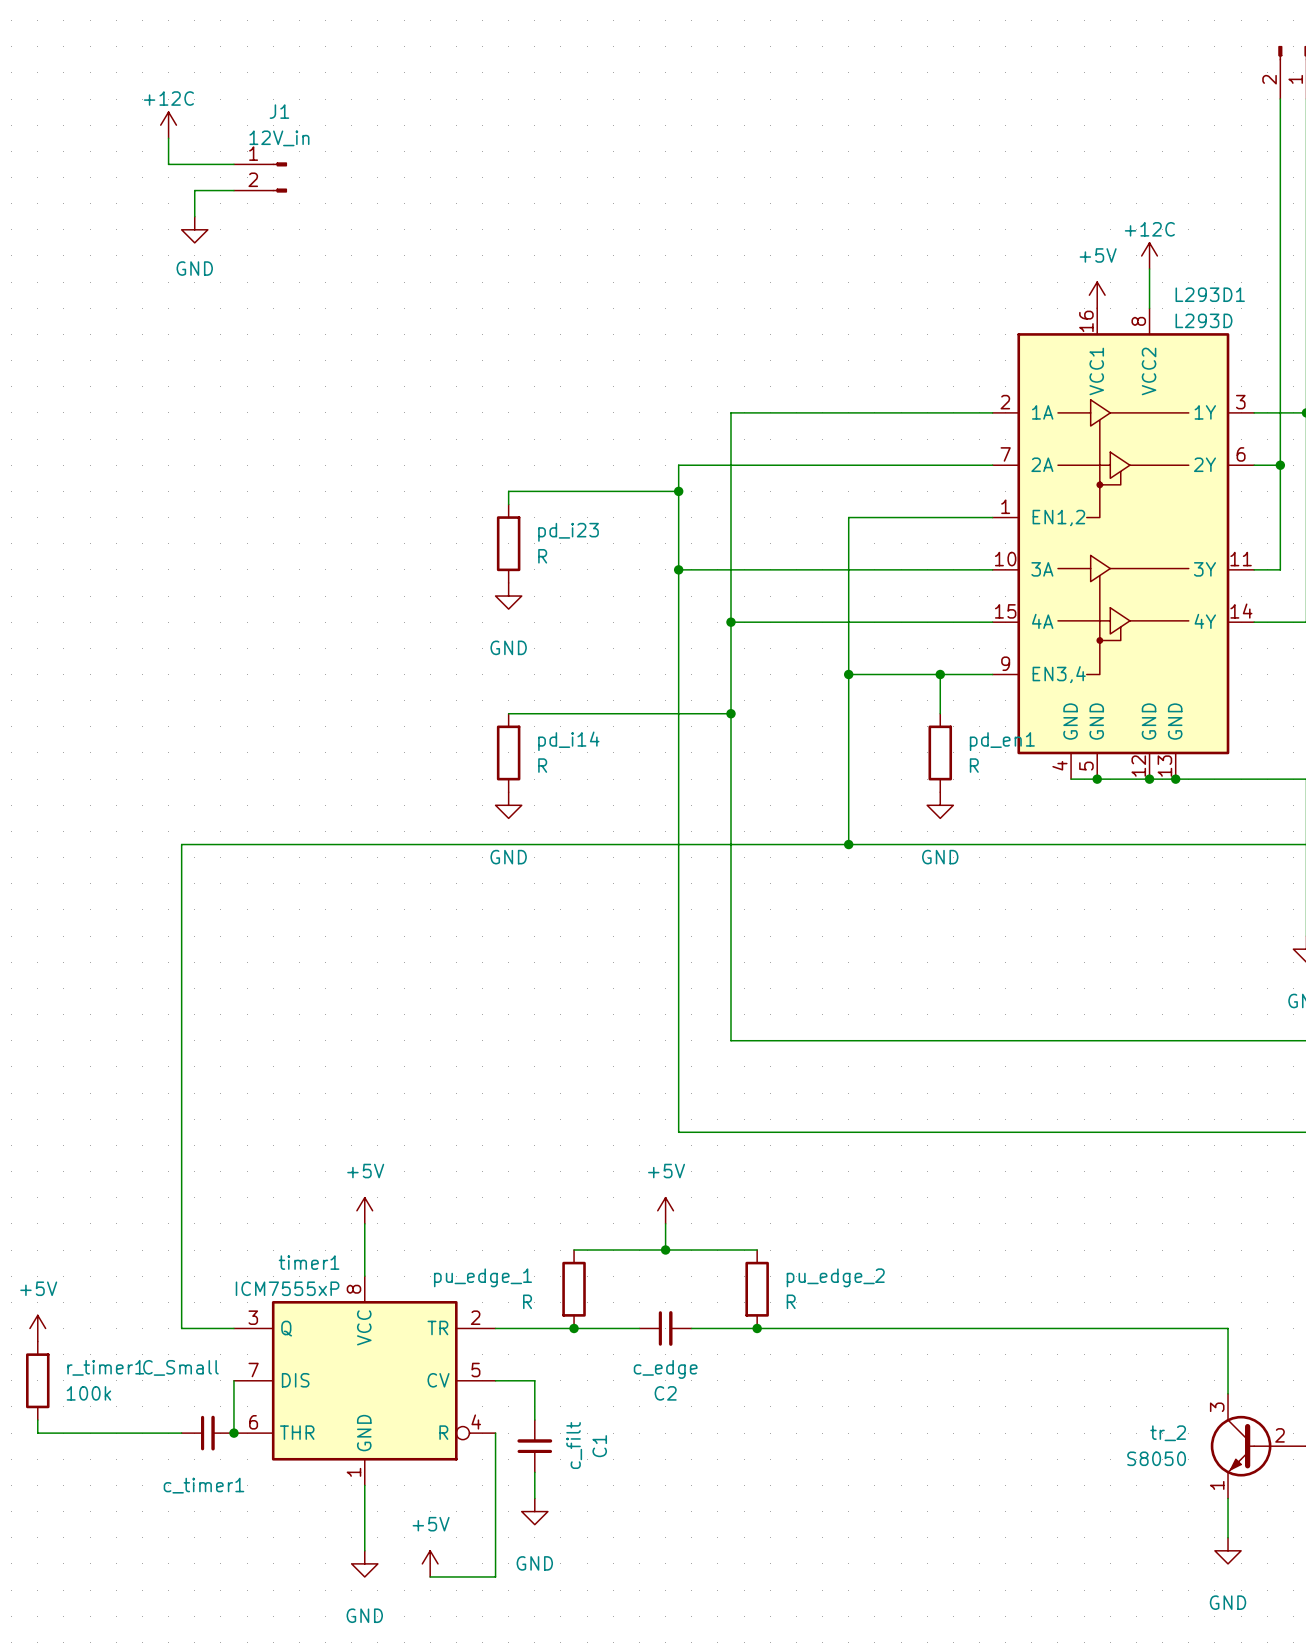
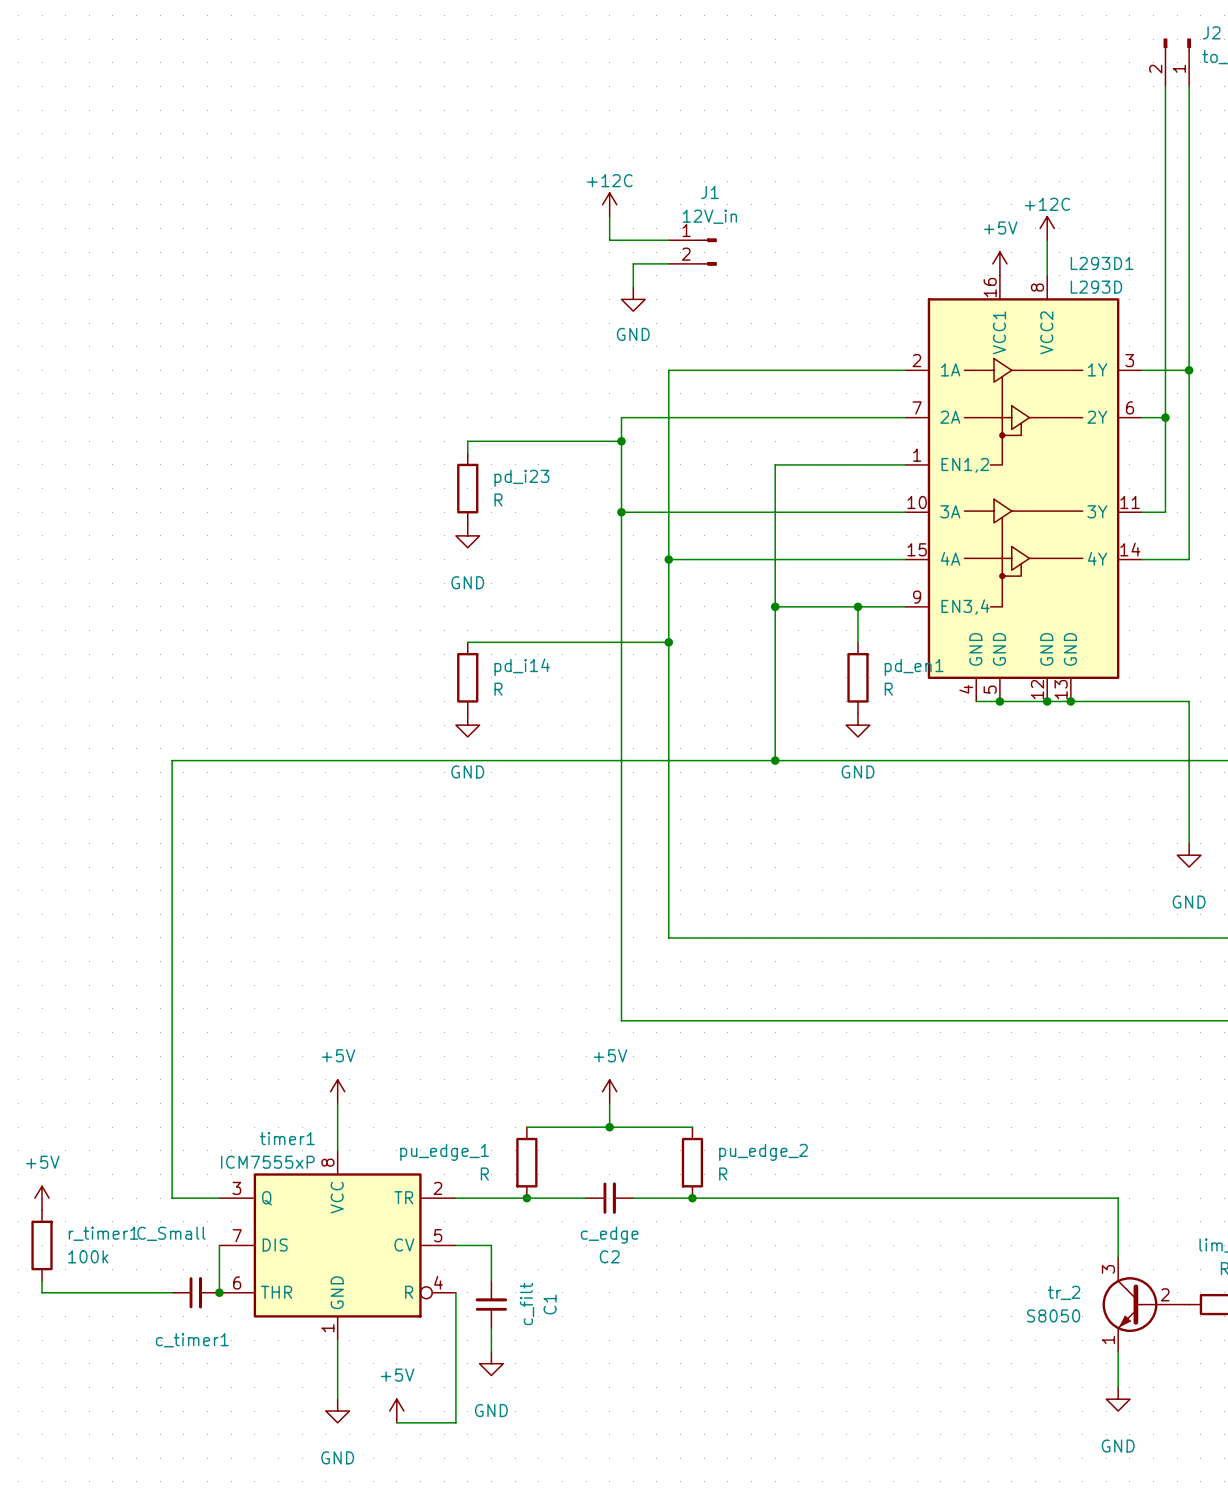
power symbol: +12C (168, 125) -> none
wire: (168, 138) (168, 164) (233, 164) -> none
J1 position: (260, 177) -> (692, 252)
wire: (233, 190) (194, 190) (194, 216) -> none
power symbol: GND (194, 229) -> none
power symbol: none -> +12C (609, 204)
wire: none -> (609, 216) (609, 240) (668, 240)
wire: none -> (668, 263) (633, 263) (633, 287)
power symbol: none -> GND (633, 299)

